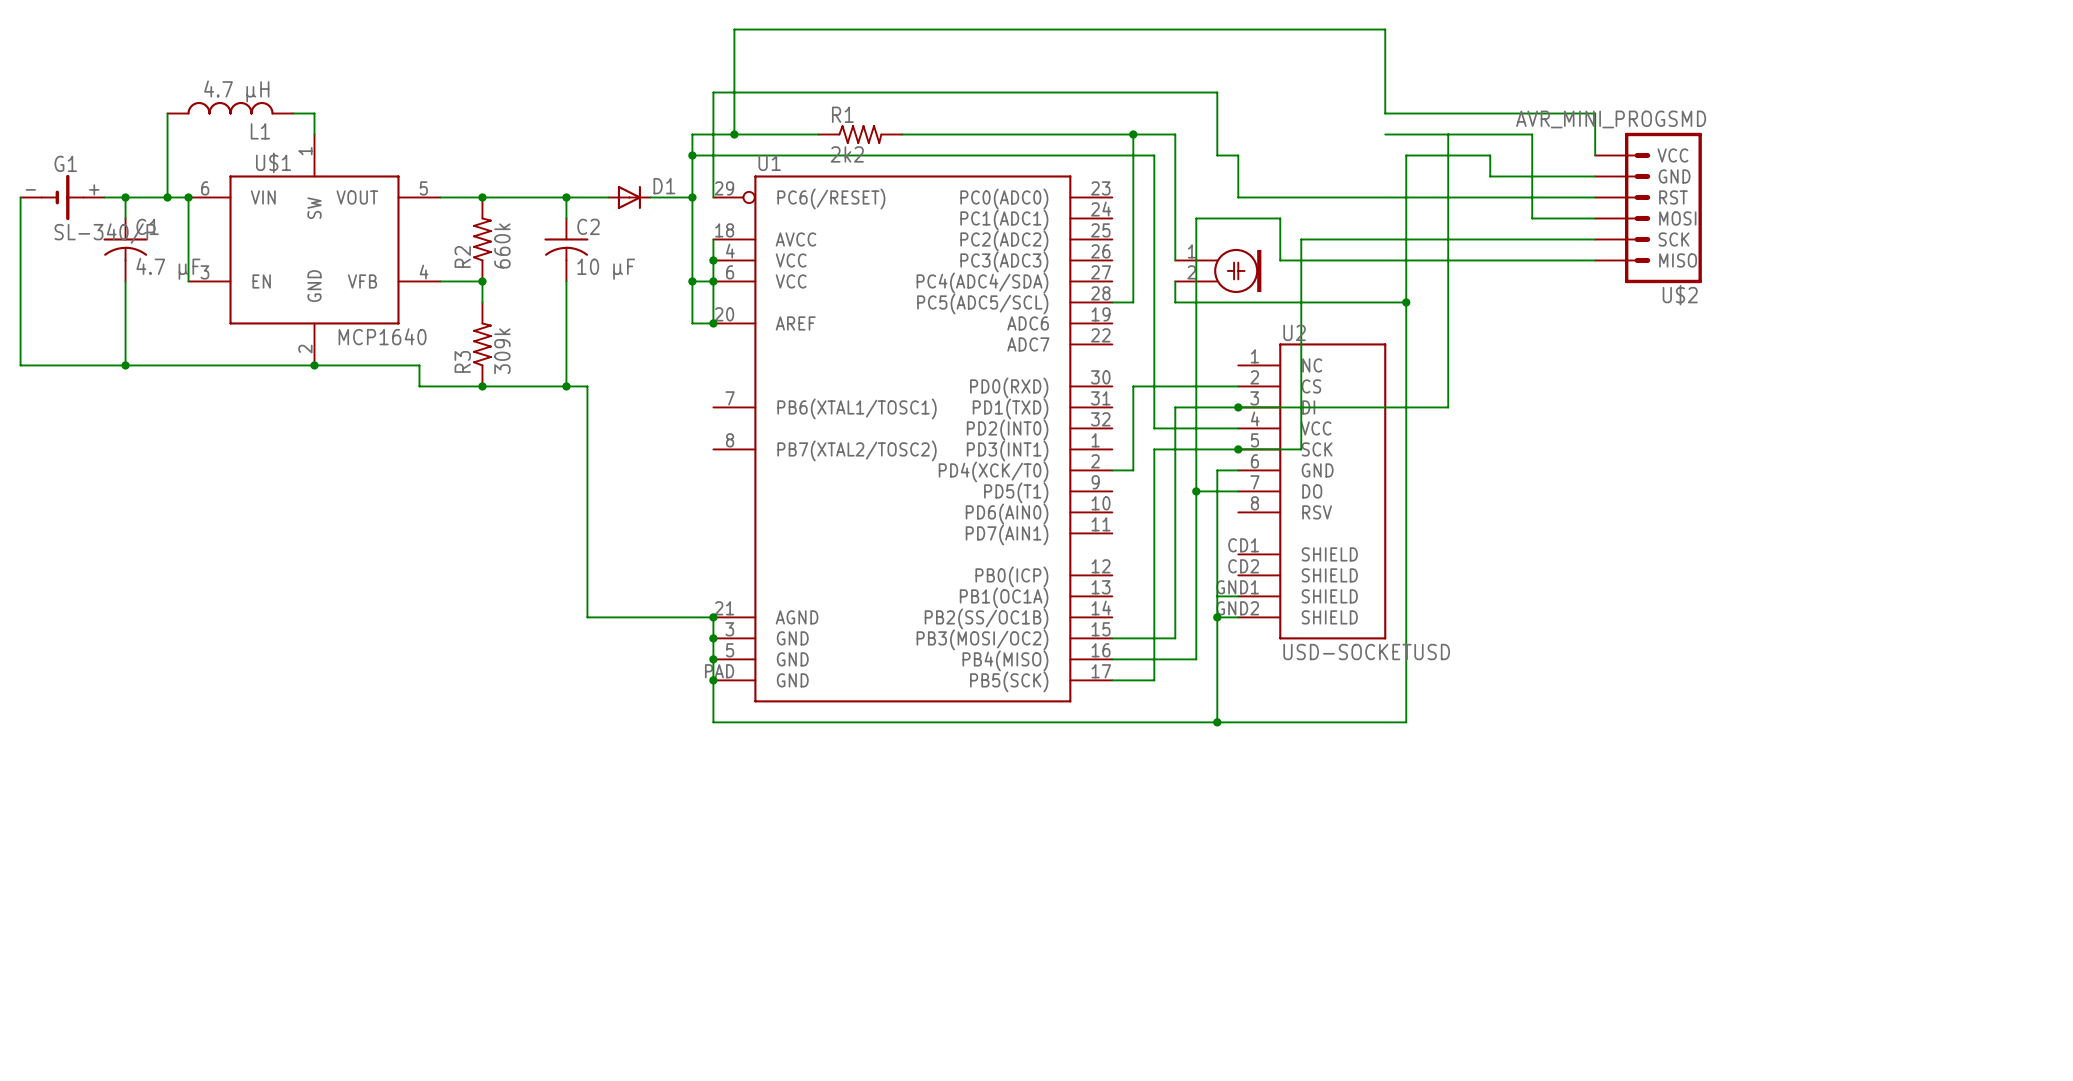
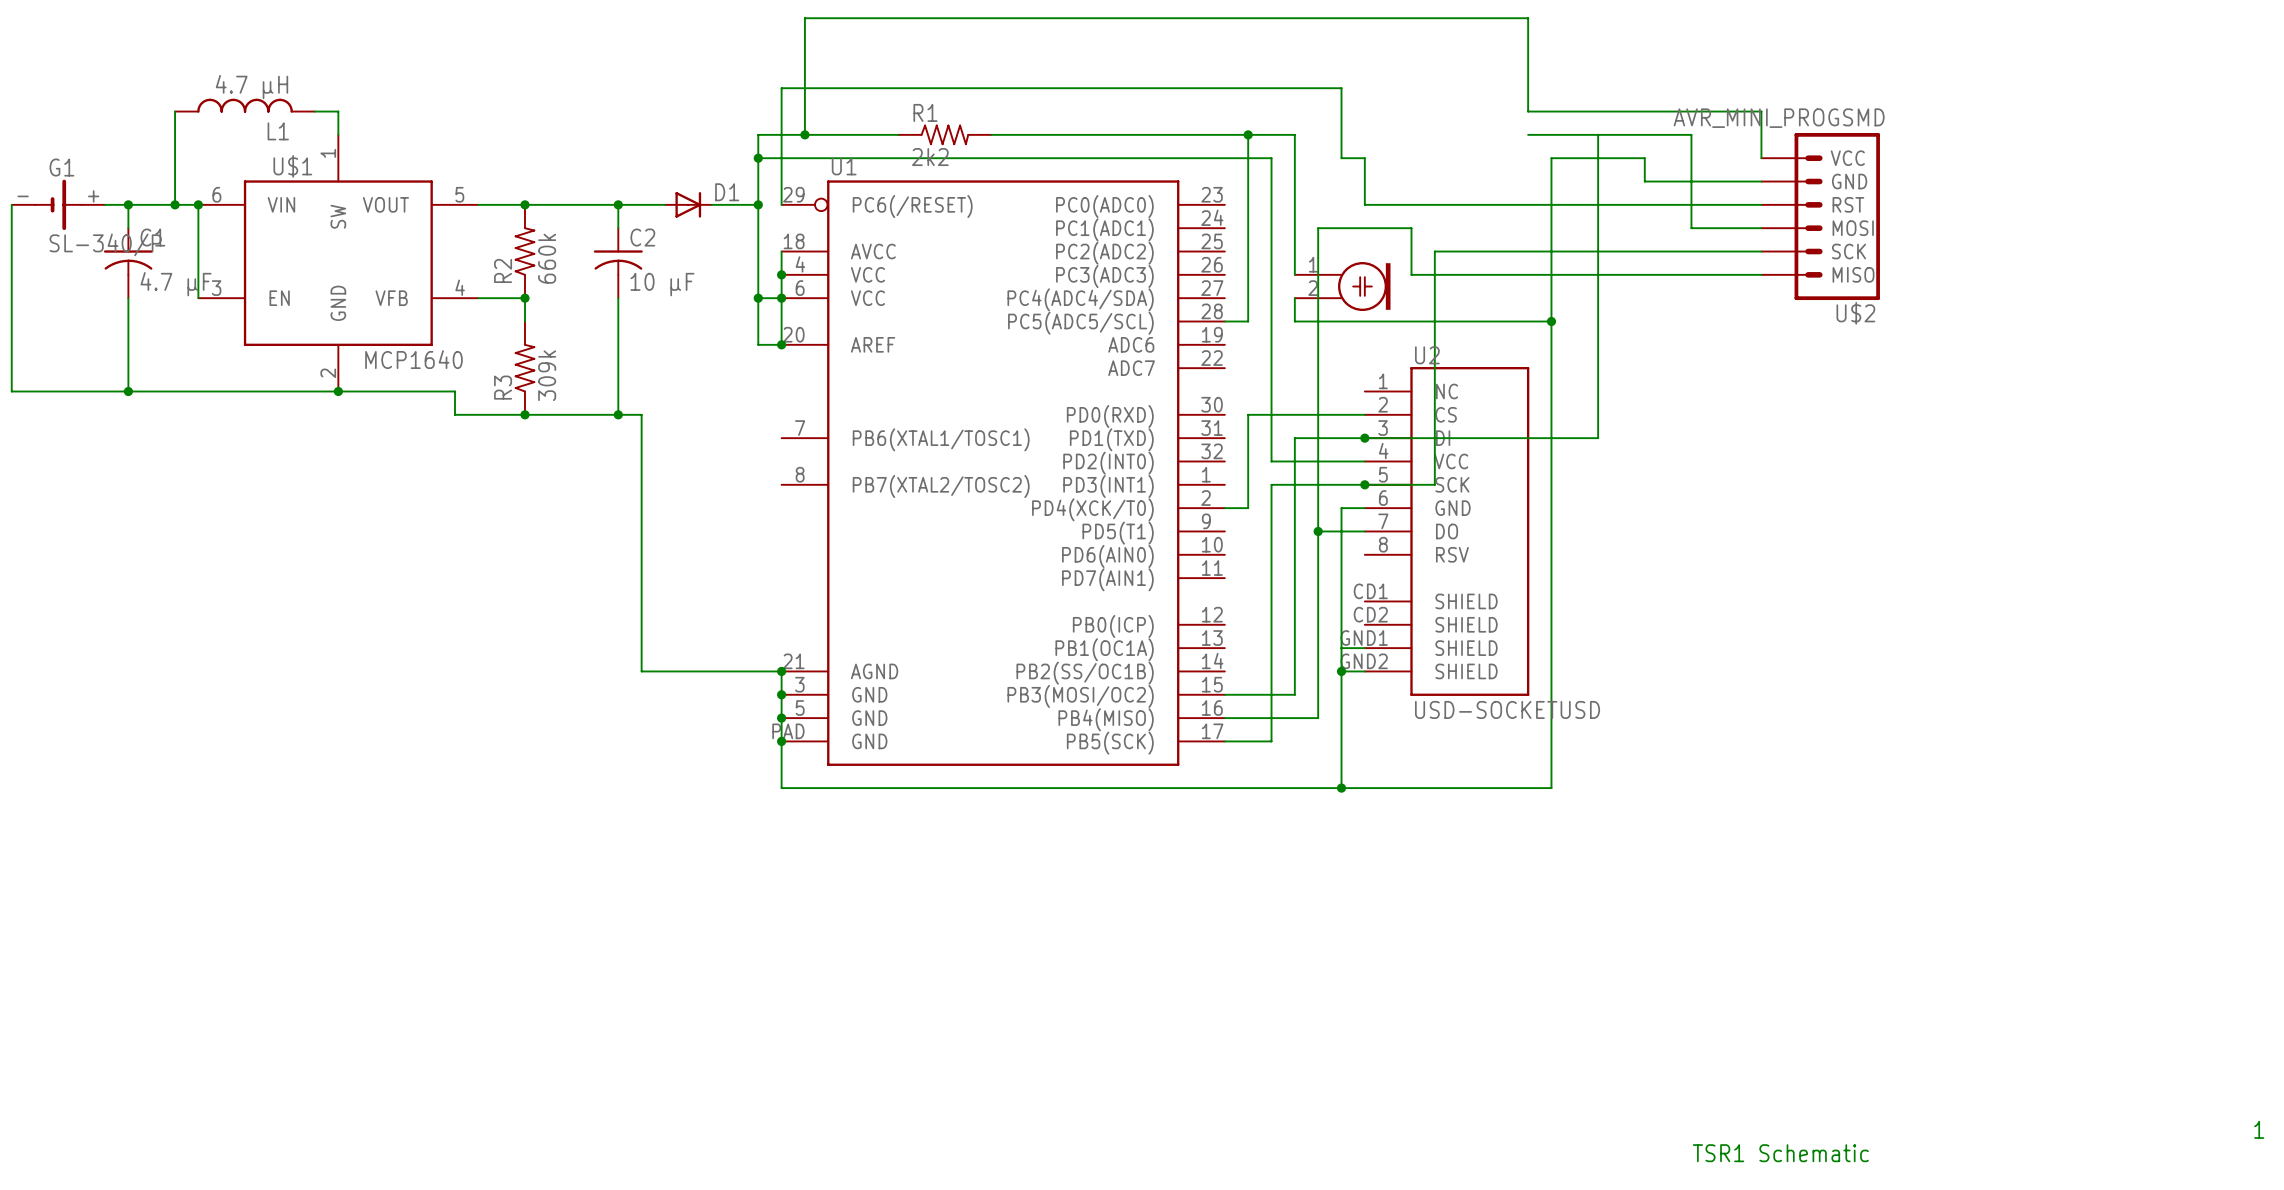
text: none -> 1 (2259, 1129)
text: none -> TSR1 Schematic (1780, 1153)

